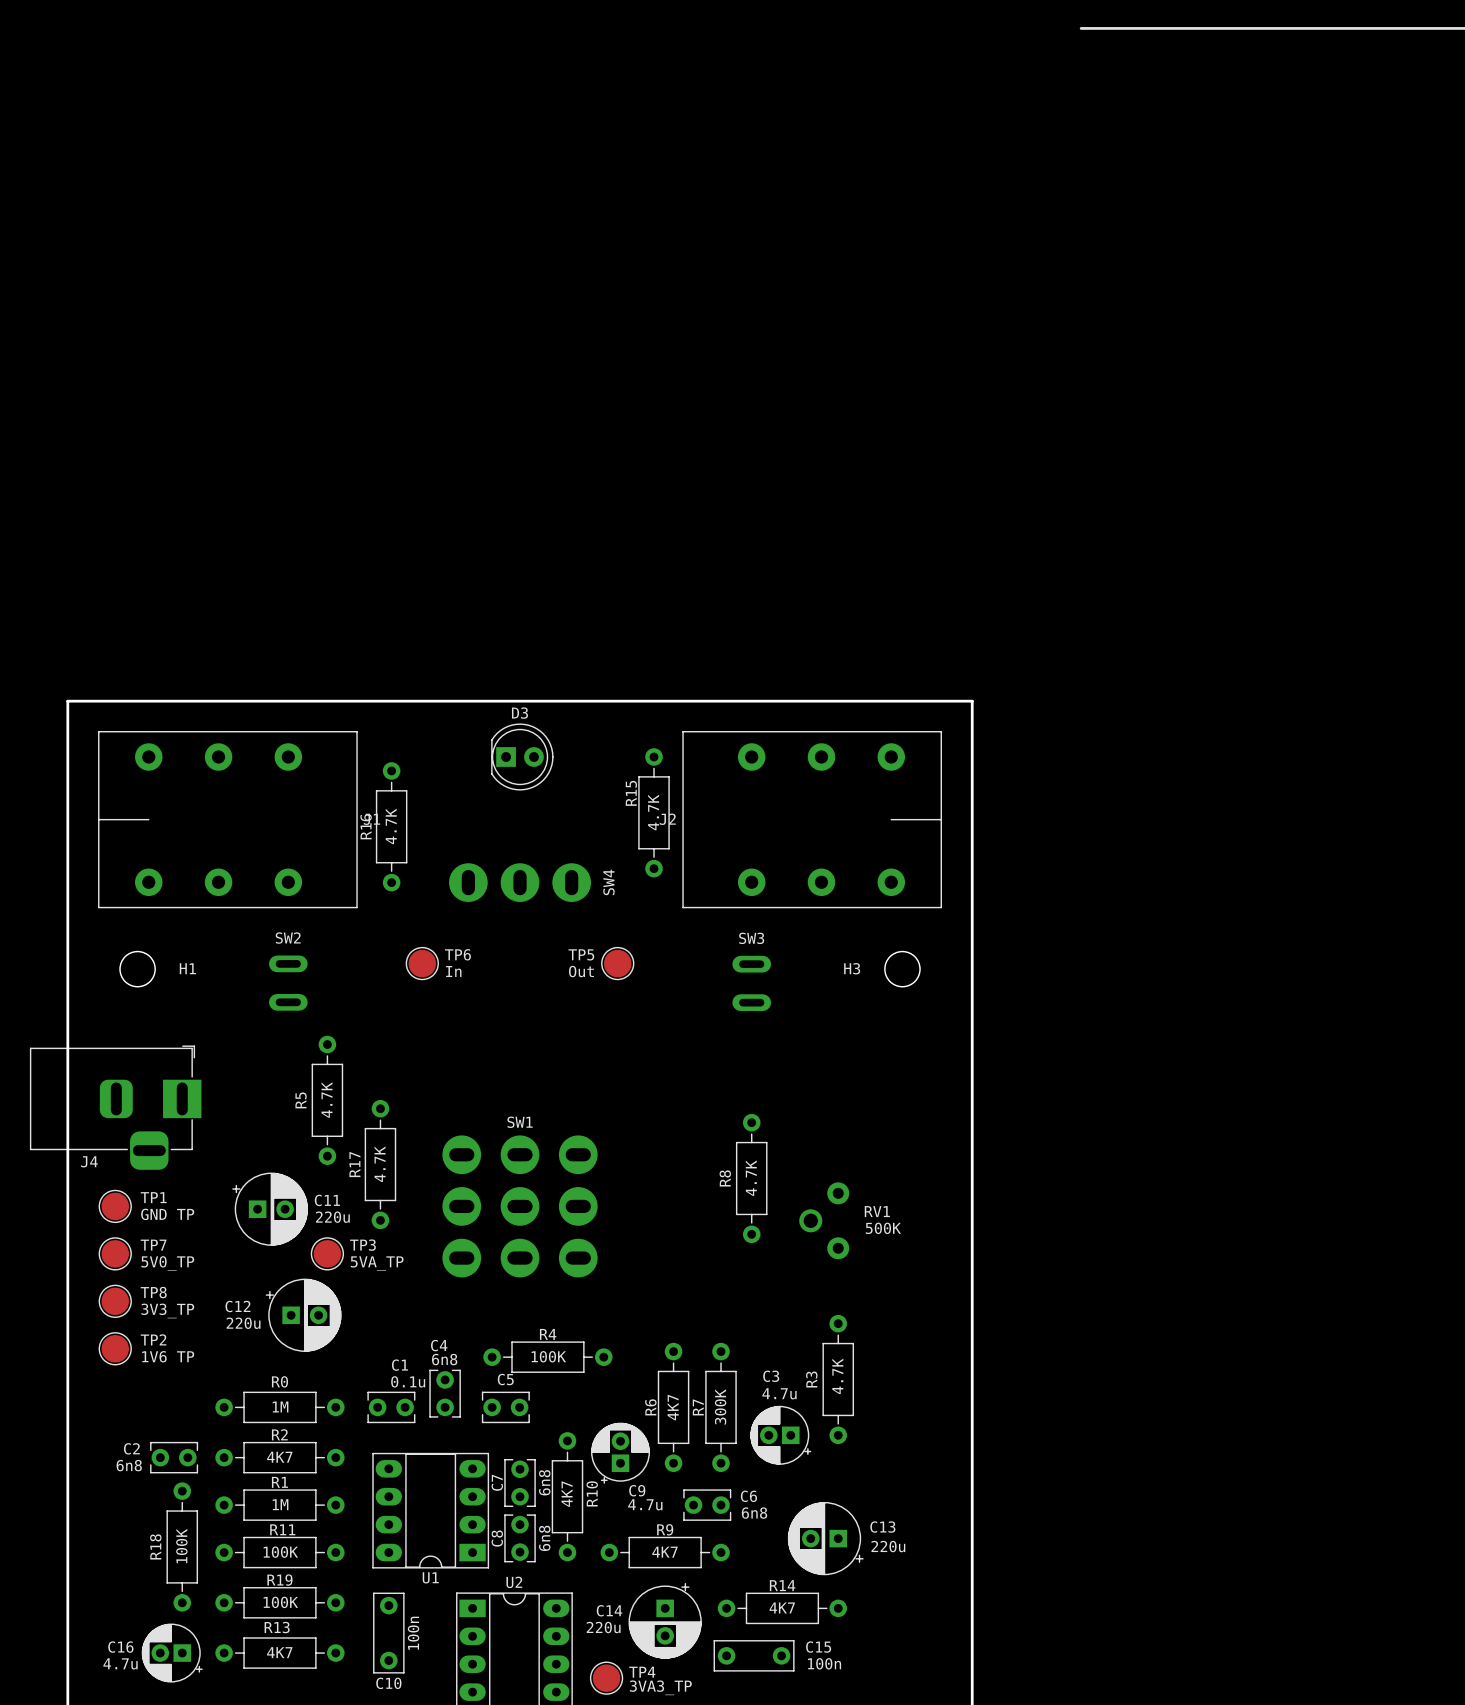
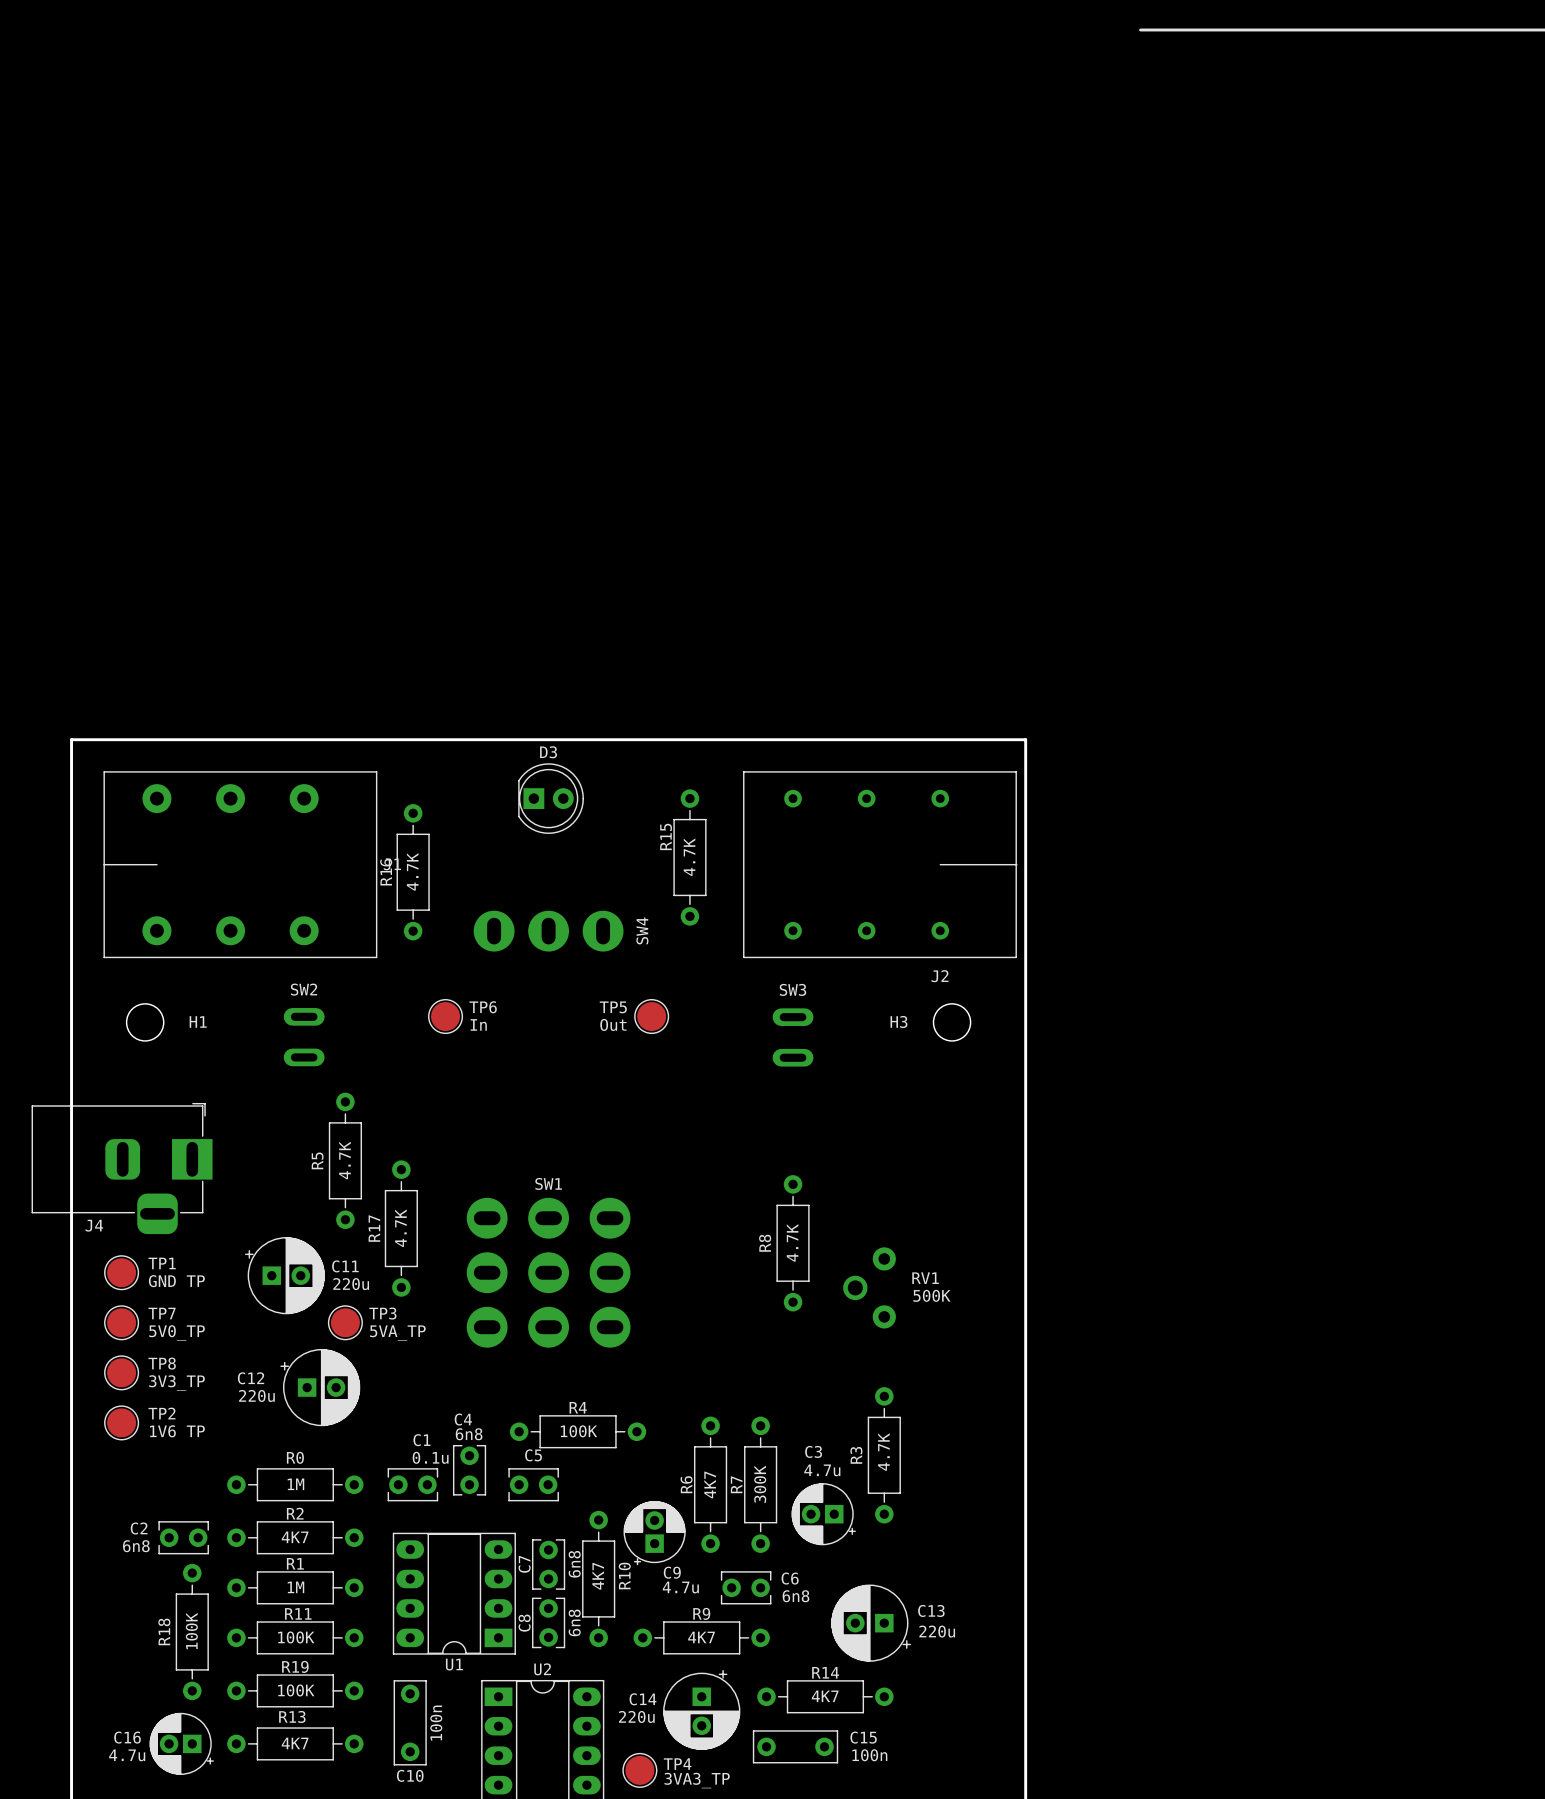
J2 footprint: [682, 731, 942, 909] -> [743, 771, 1018, 959]
J2 name position: J2 (667, 819) -> J2 (940, 976)

